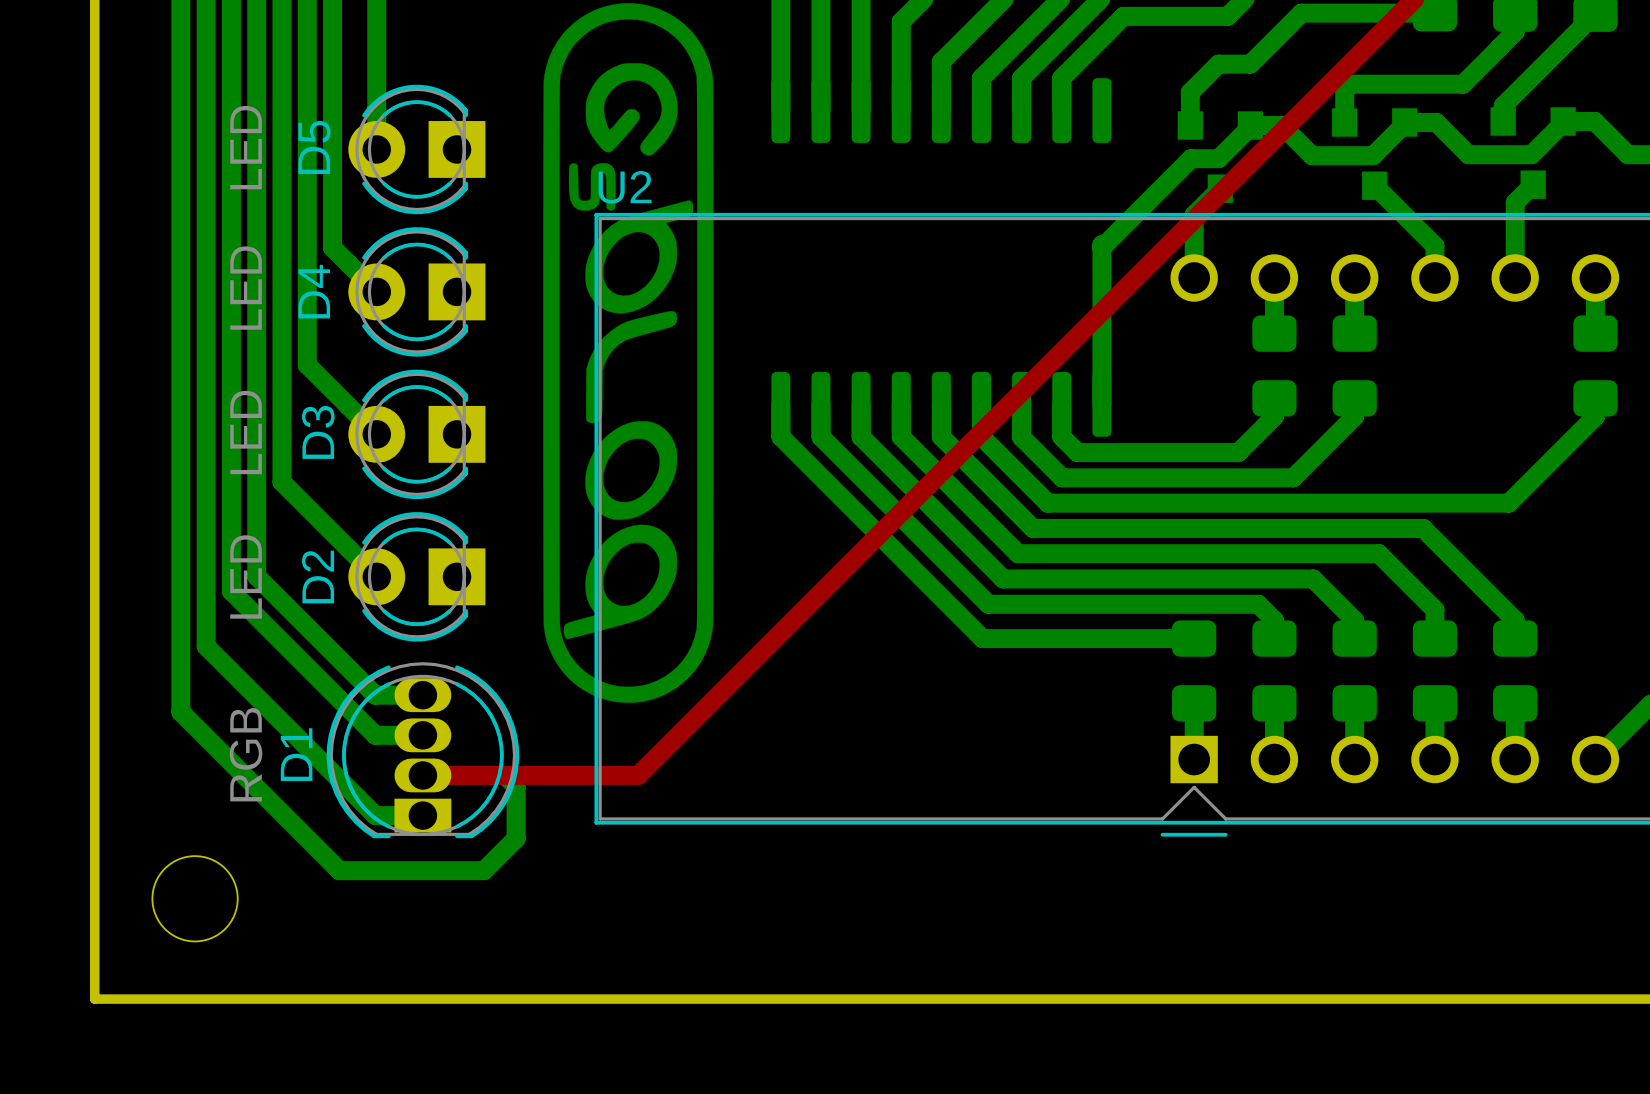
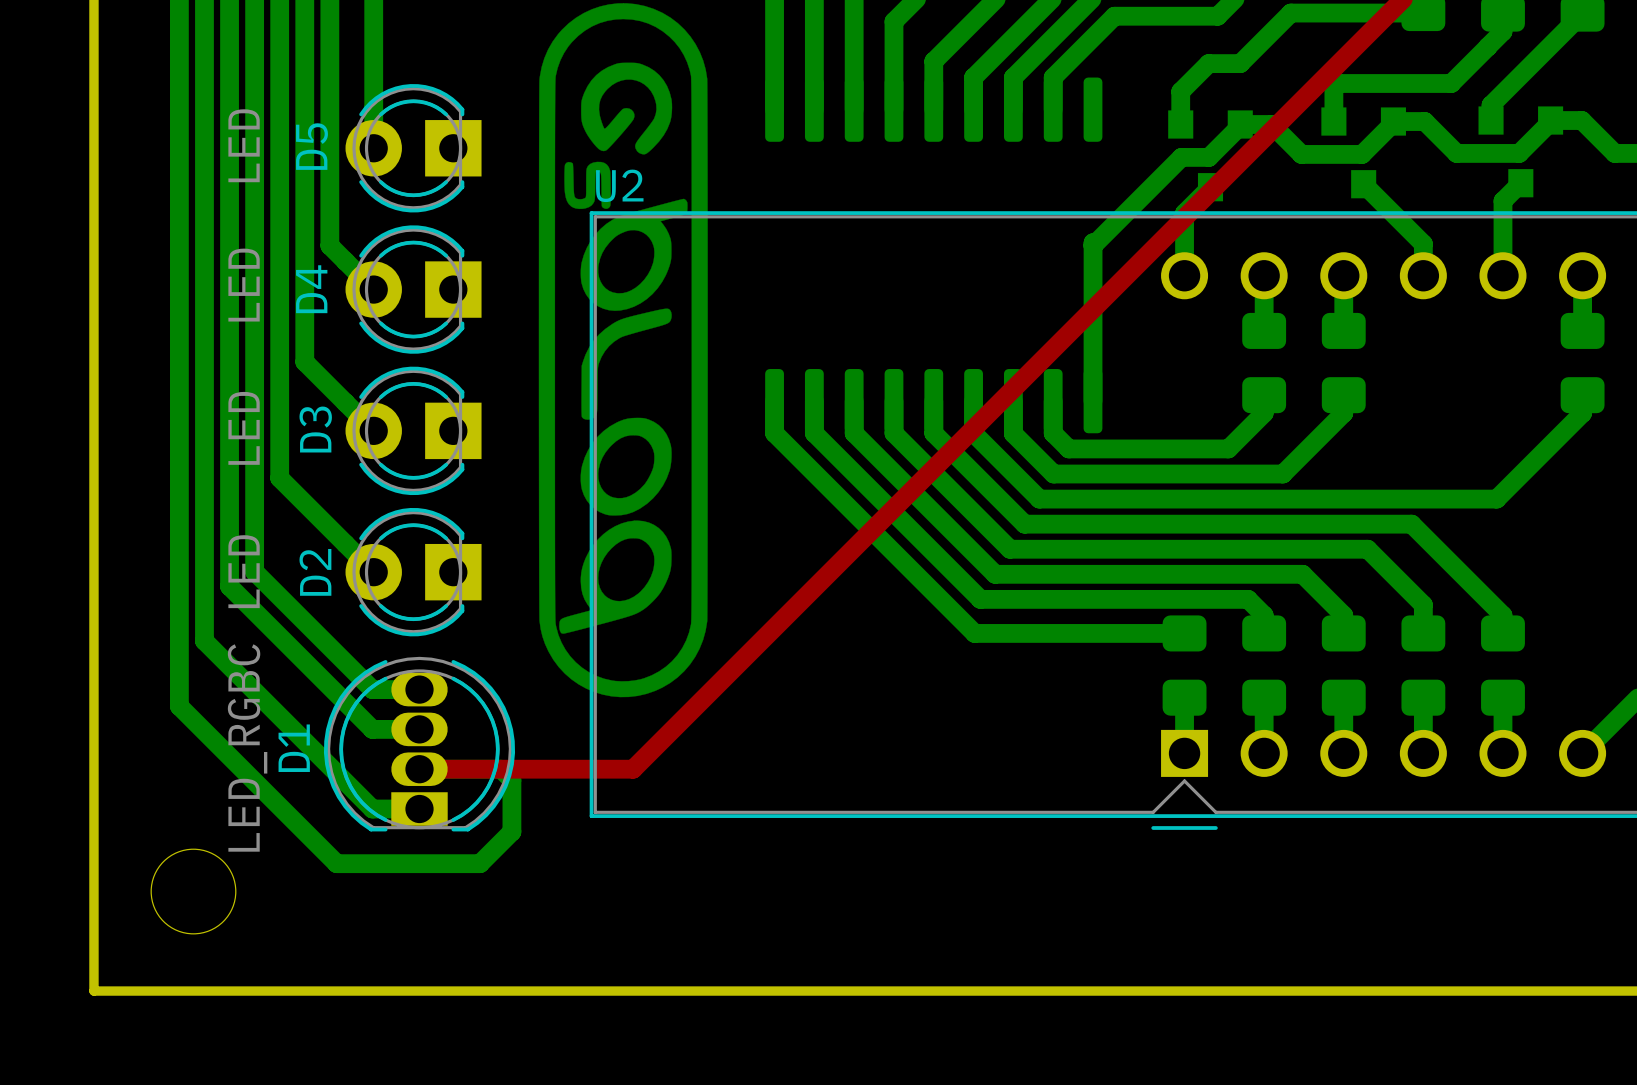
D1 value: RGB (246, 754) -> LED_RGBC (247, 748)

